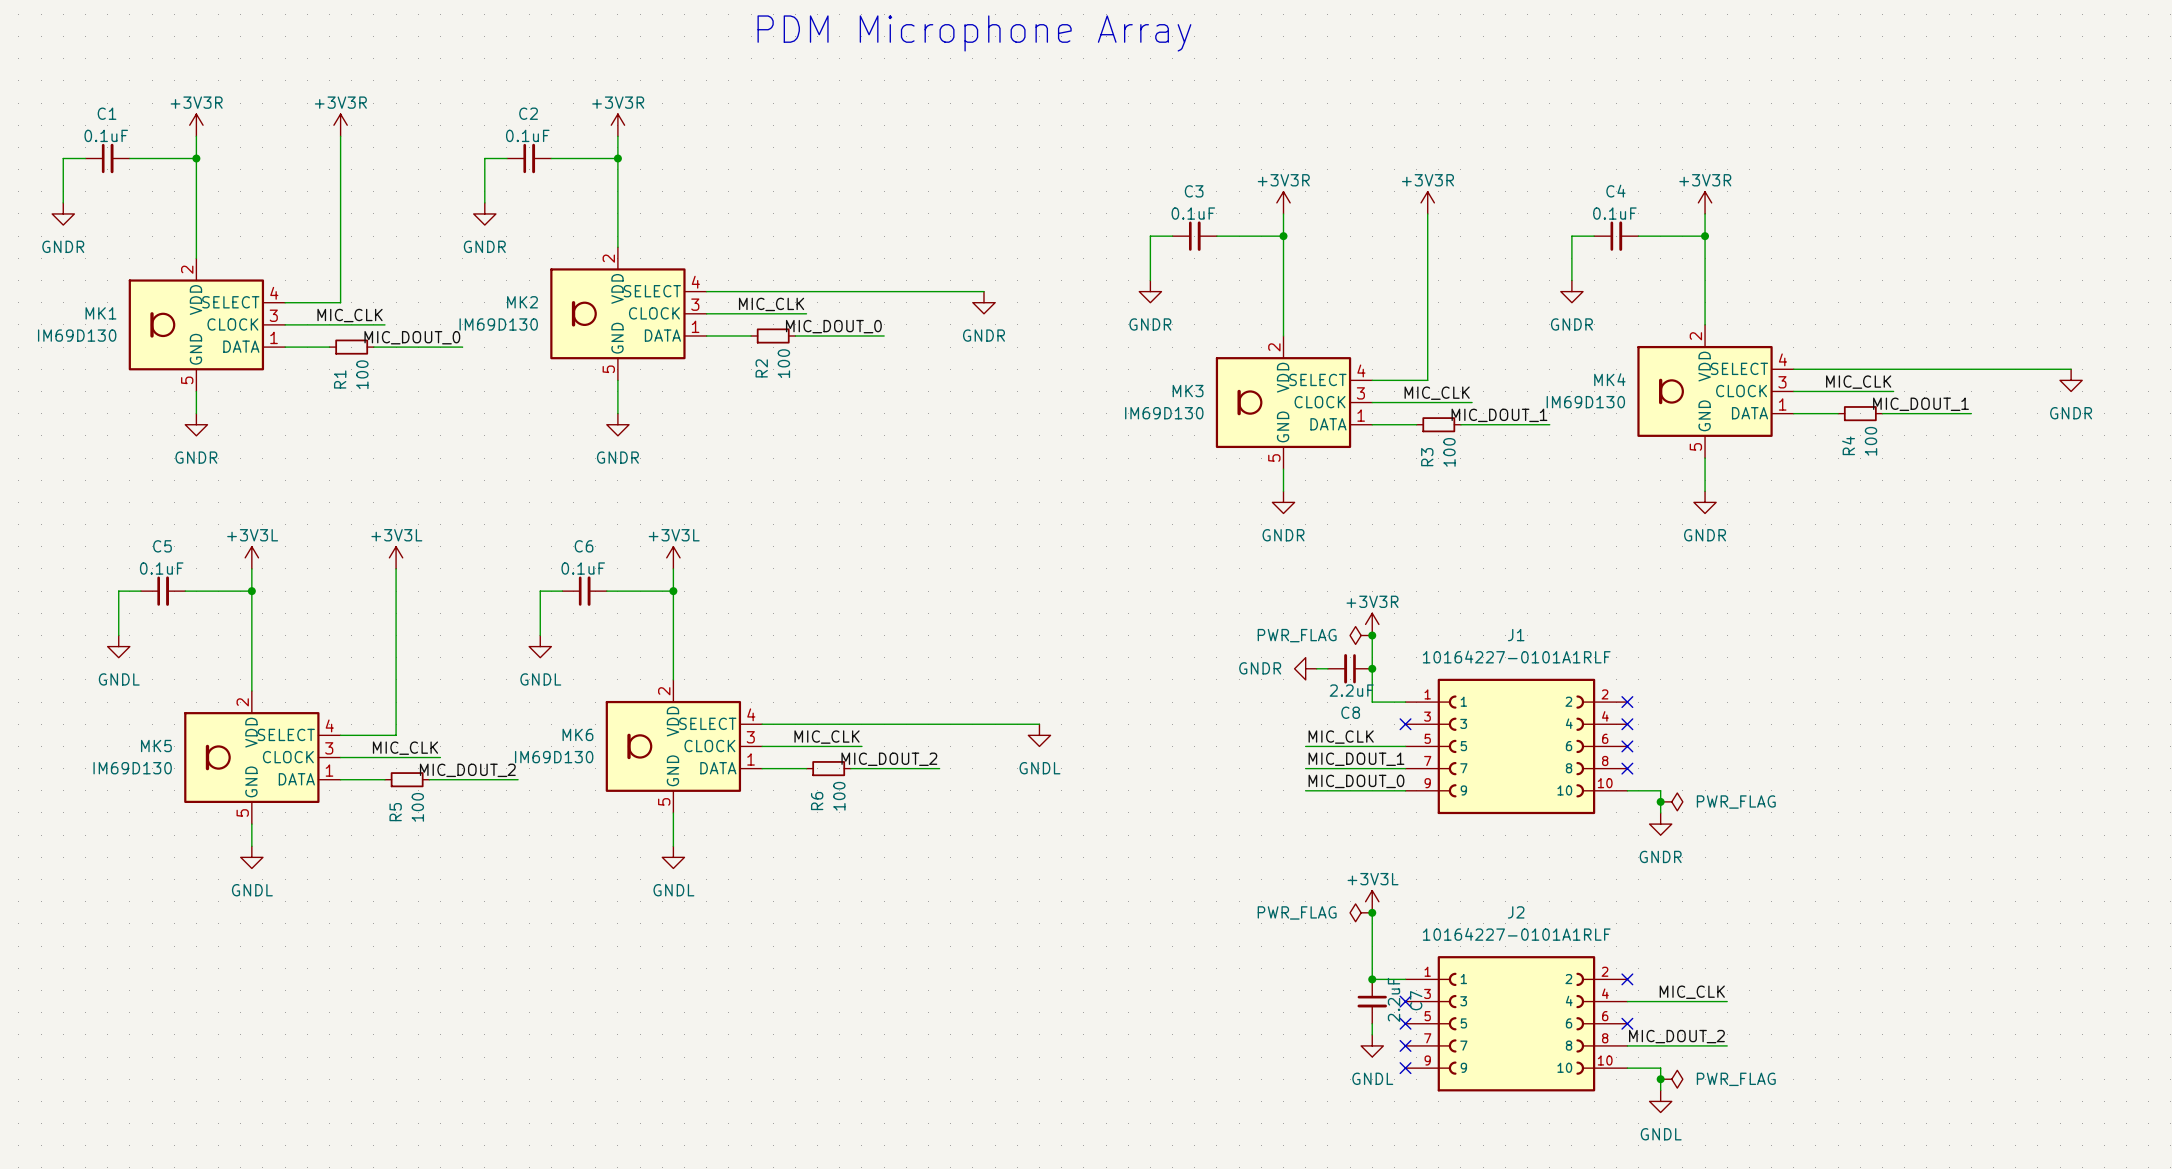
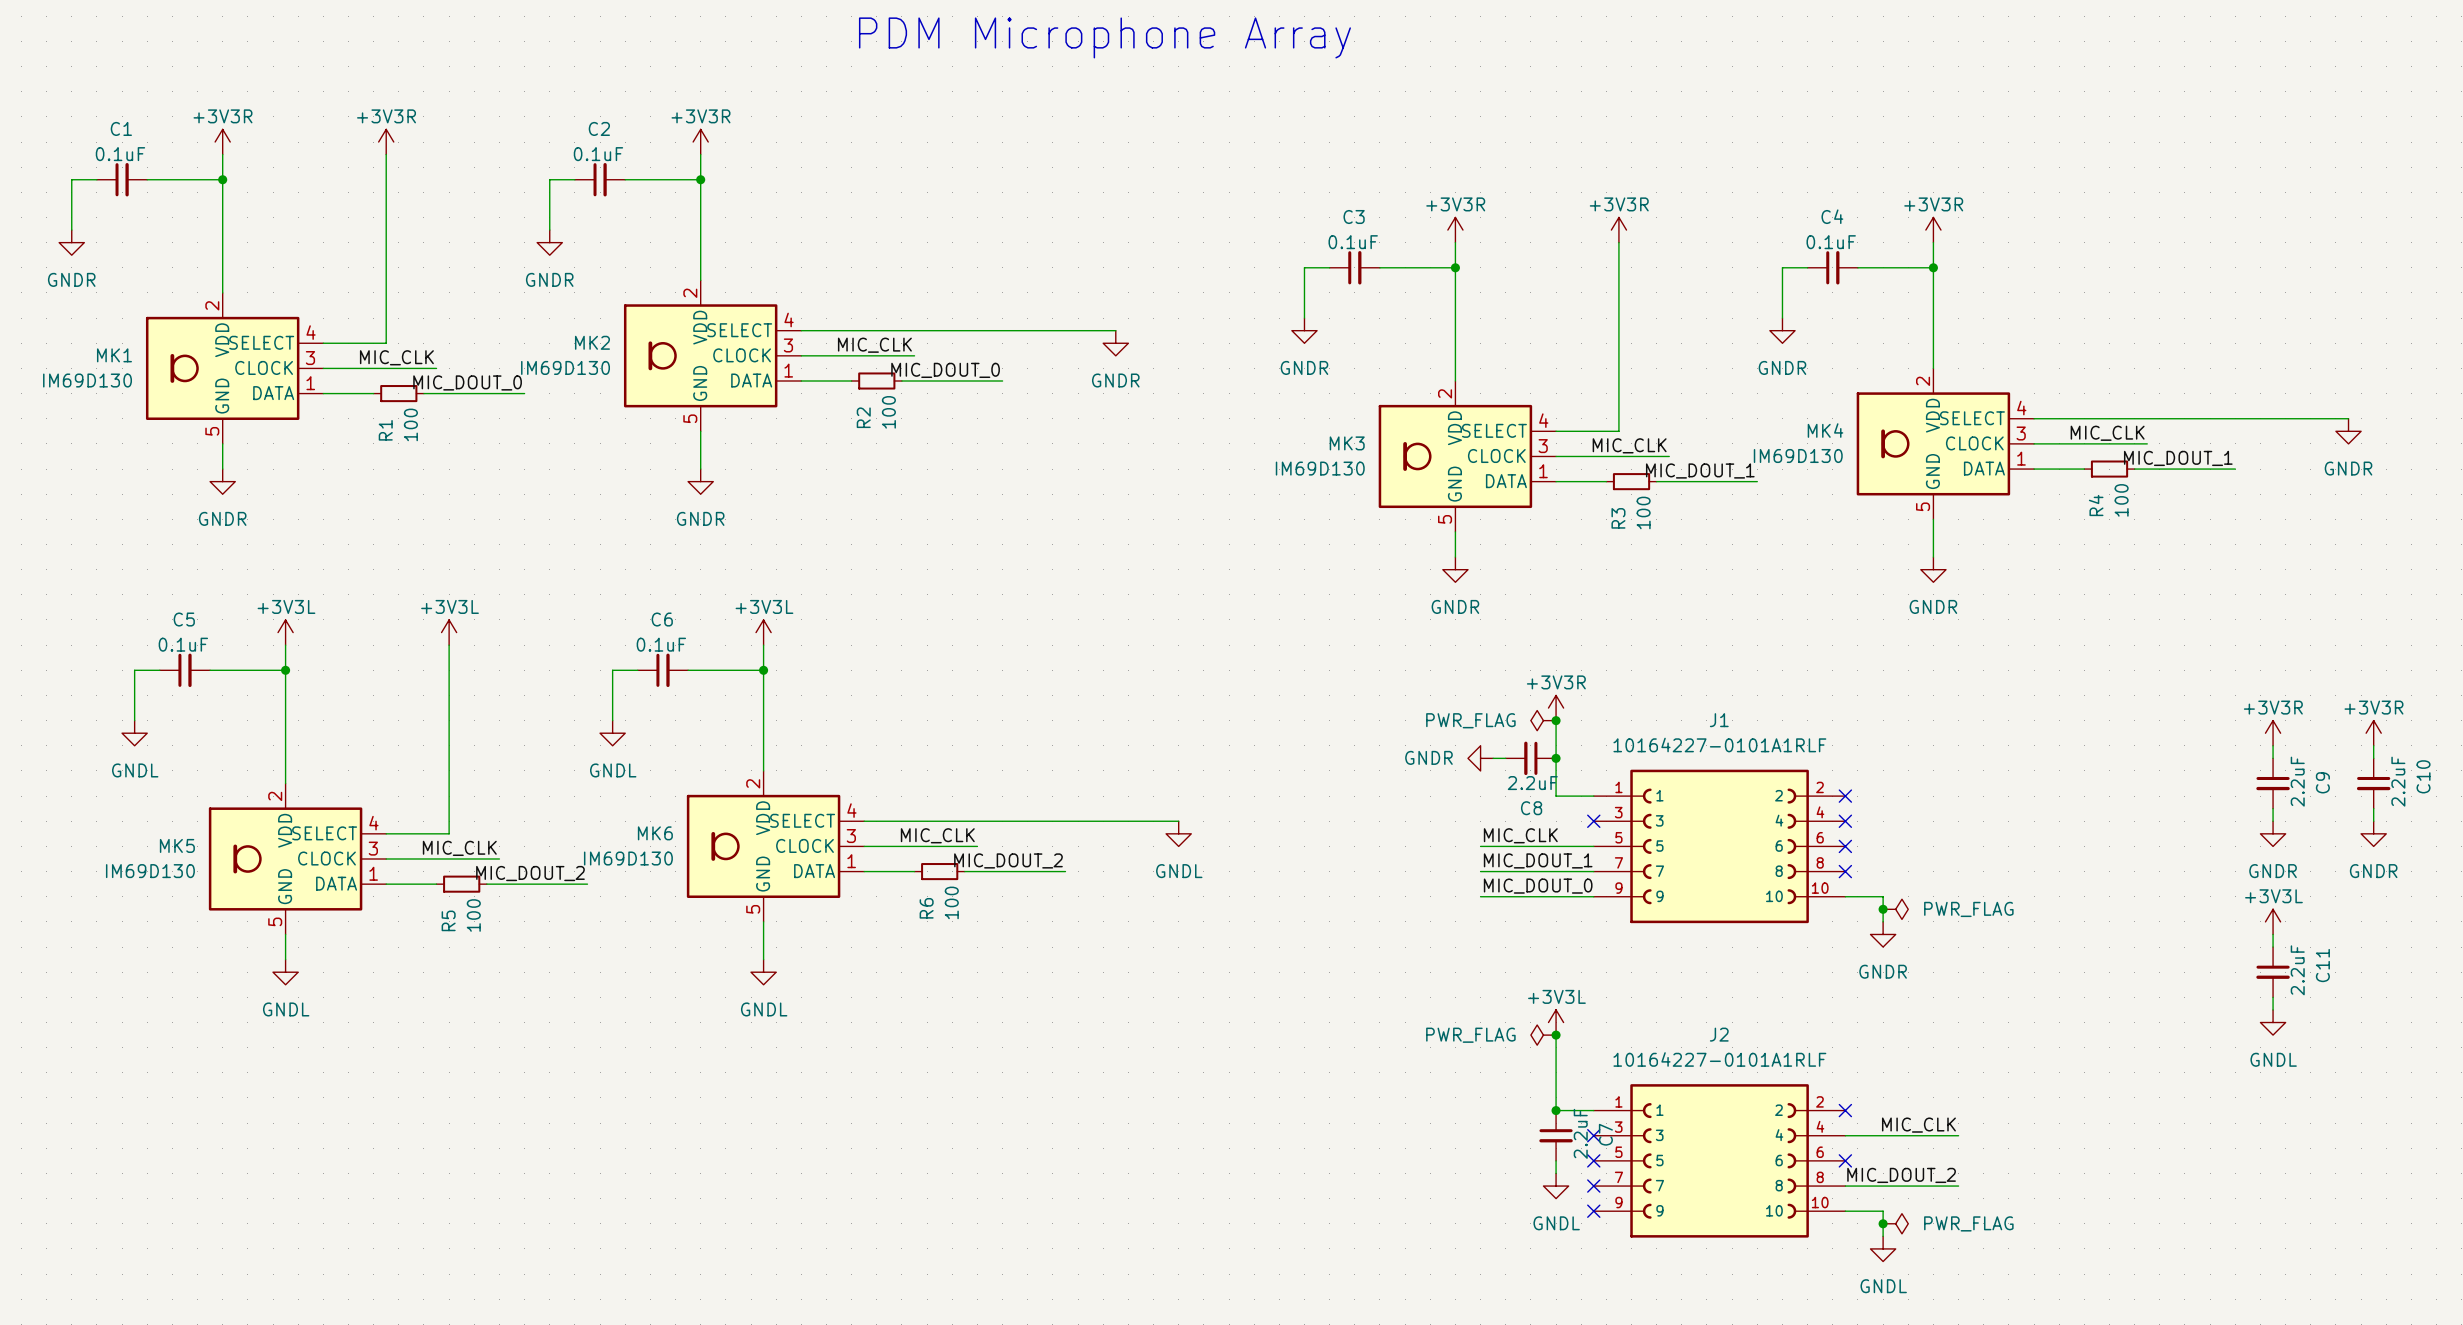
power symbol: none -> +3V3R (2273, 733)
power symbol: none -> +3V3R (2373, 733)
wire: none -> (2273, 745) (2273, 758)
wire: none -> (2373, 745) (2373, 758)
C9: none -> 2.2uF (2273, 783)
C10: none -> 2.2uF (2373, 783)
wire: none -> (2273, 808) (2273, 821)
wire: none -> (2373, 808) (2373, 821)
power symbol: none -> GNDR (2273, 833)
power symbol: none -> GNDR (2373, 833)
power symbol: none -> +3V3L (2273, 921)
wire: none -> (2273, 934) (2273, 947)
C11: none -> 2.2uF (2273, 972)
wire: none -> (2273, 997) (2273, 1009)
power symbol: none -> GNDL (2273, 1022)

